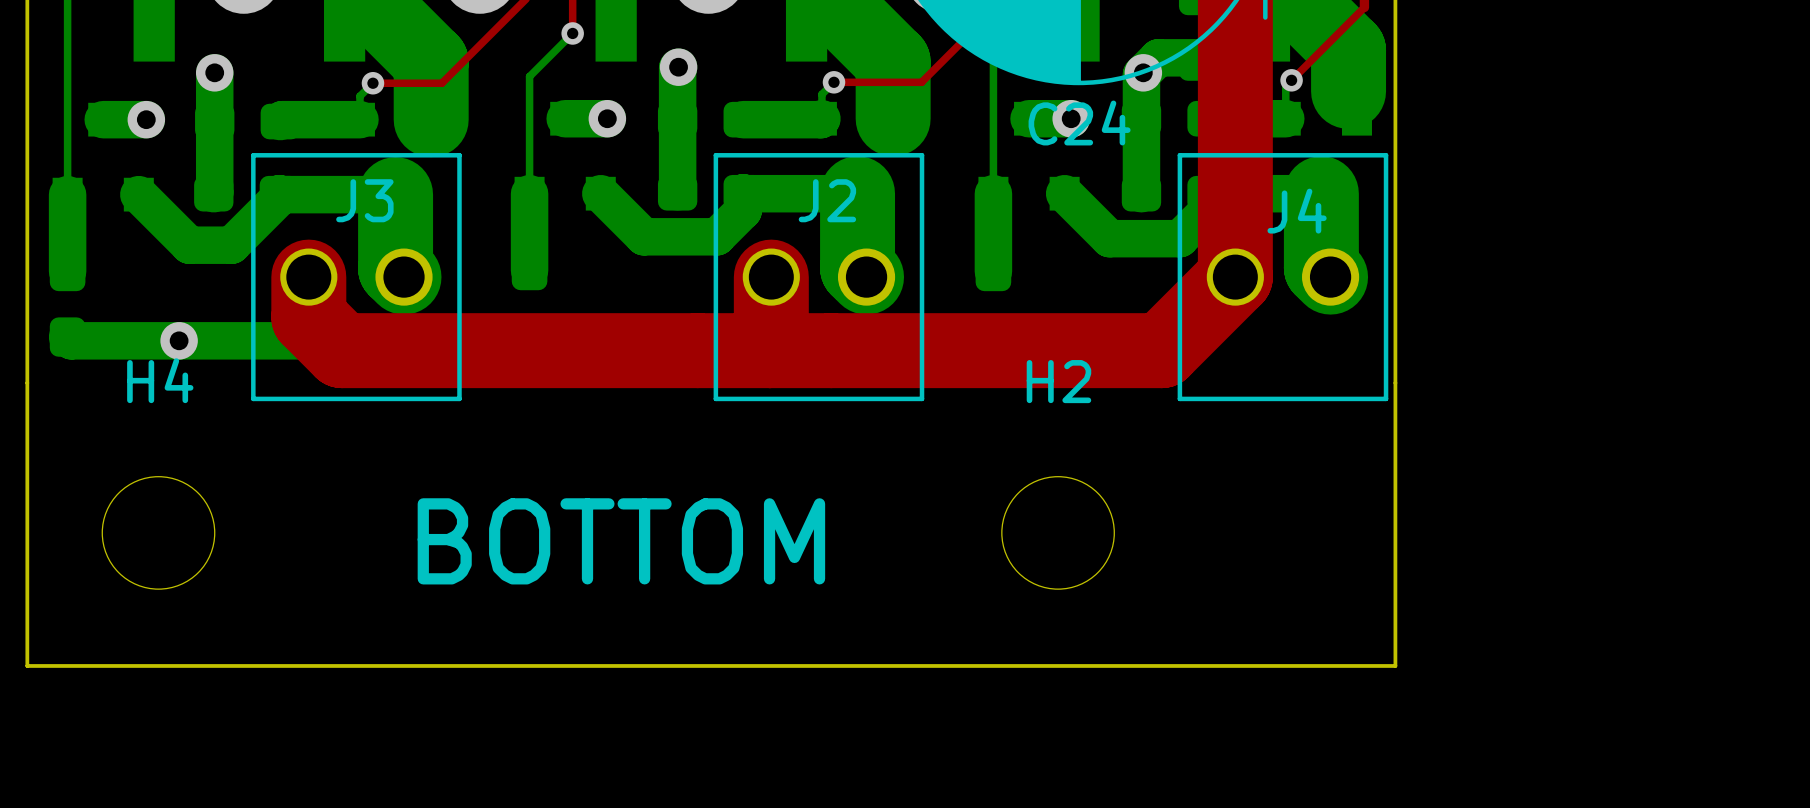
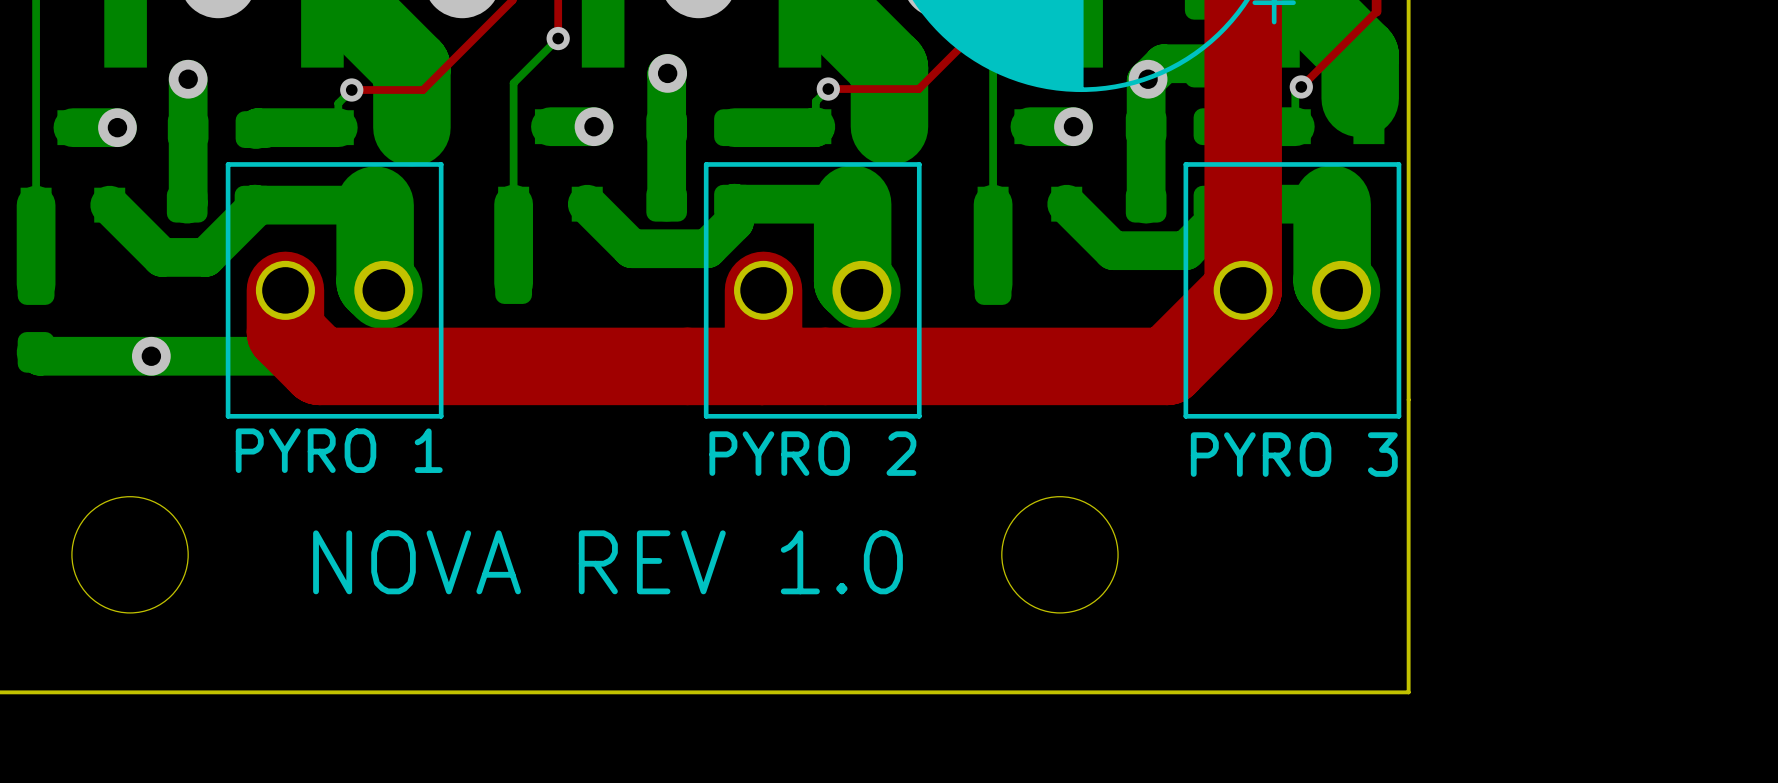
C24 name: C24 (1079, 123) -> none
J3 name: J3 (364, 200) -> PYRO 1 (339, 450)
J2 name: J2 (827, 200) -> PYRO 2 (812, 453)
J4 name: J4 (1297, 211) -> PYRO 3 (1294, 454)
H4 name: H4 (160, 380) -> none
H2 name: H2 (1058, 381) -> none
text: BOTTOM (621, 541) -> NOVA REV 1.0 (608, 562)

